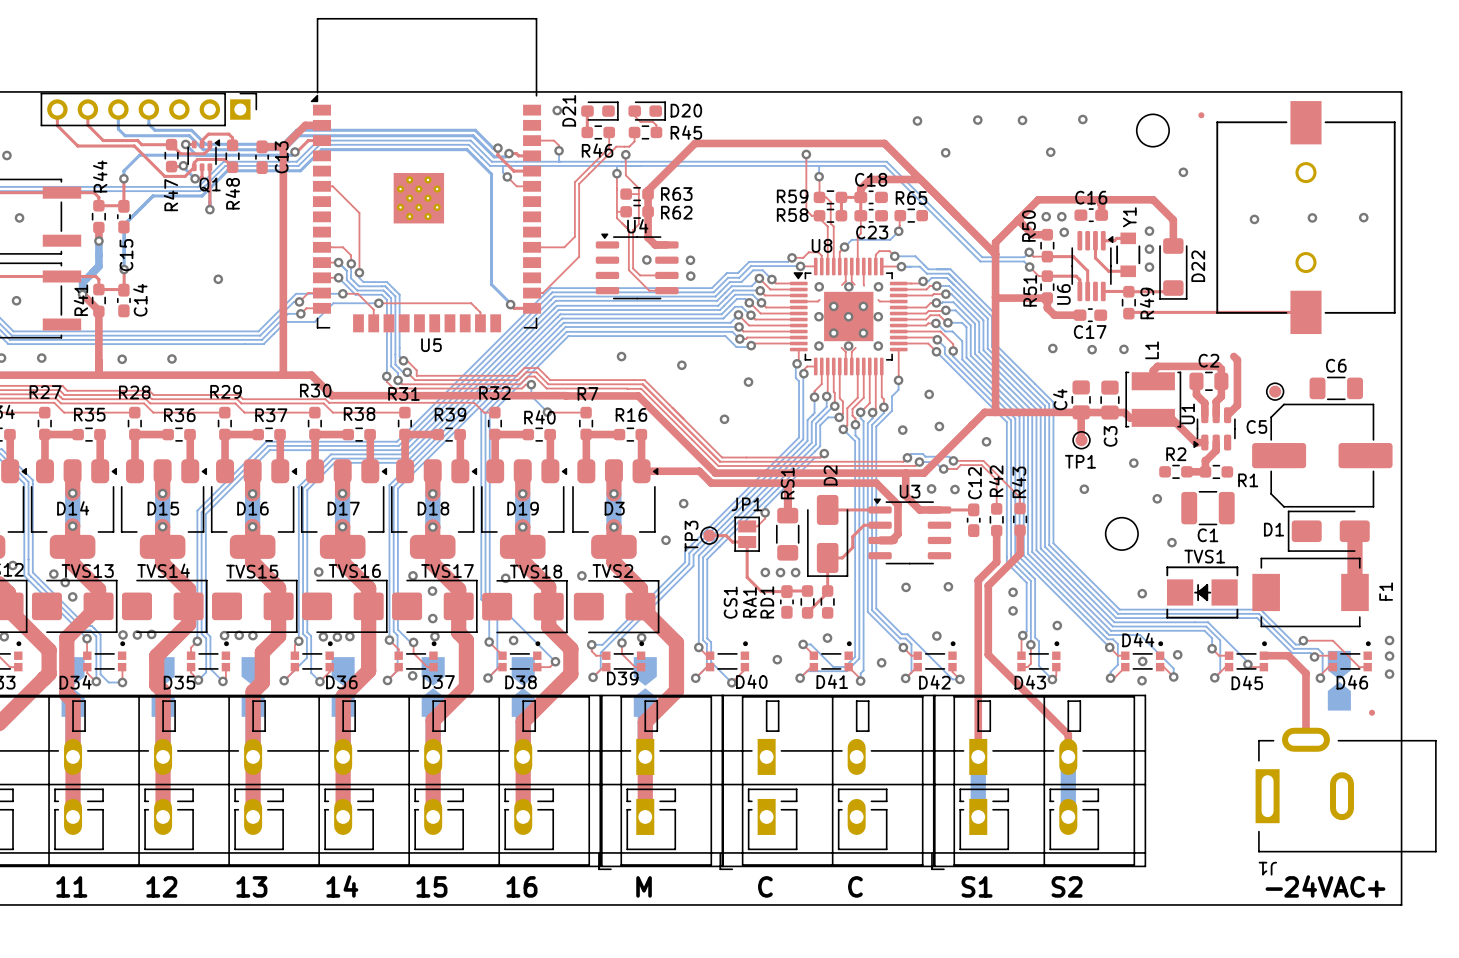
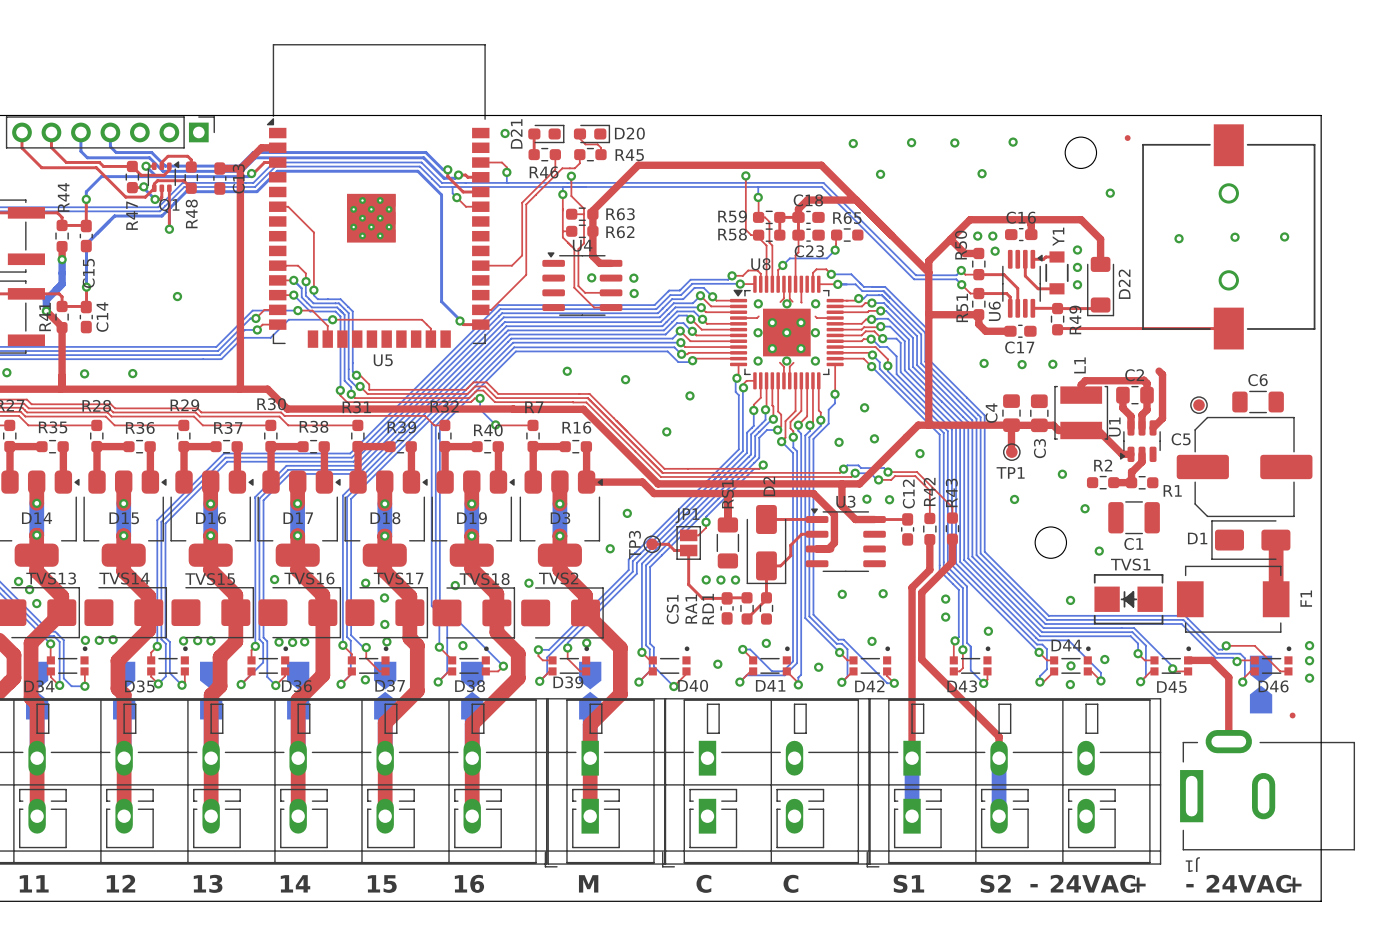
part: (1038, 782) -> none
part: none -> (1013, 782)
text: none -> 24VAC (1092, 883)
text: none -> - (1034, 885)
text: none -> + (1138, 885)

